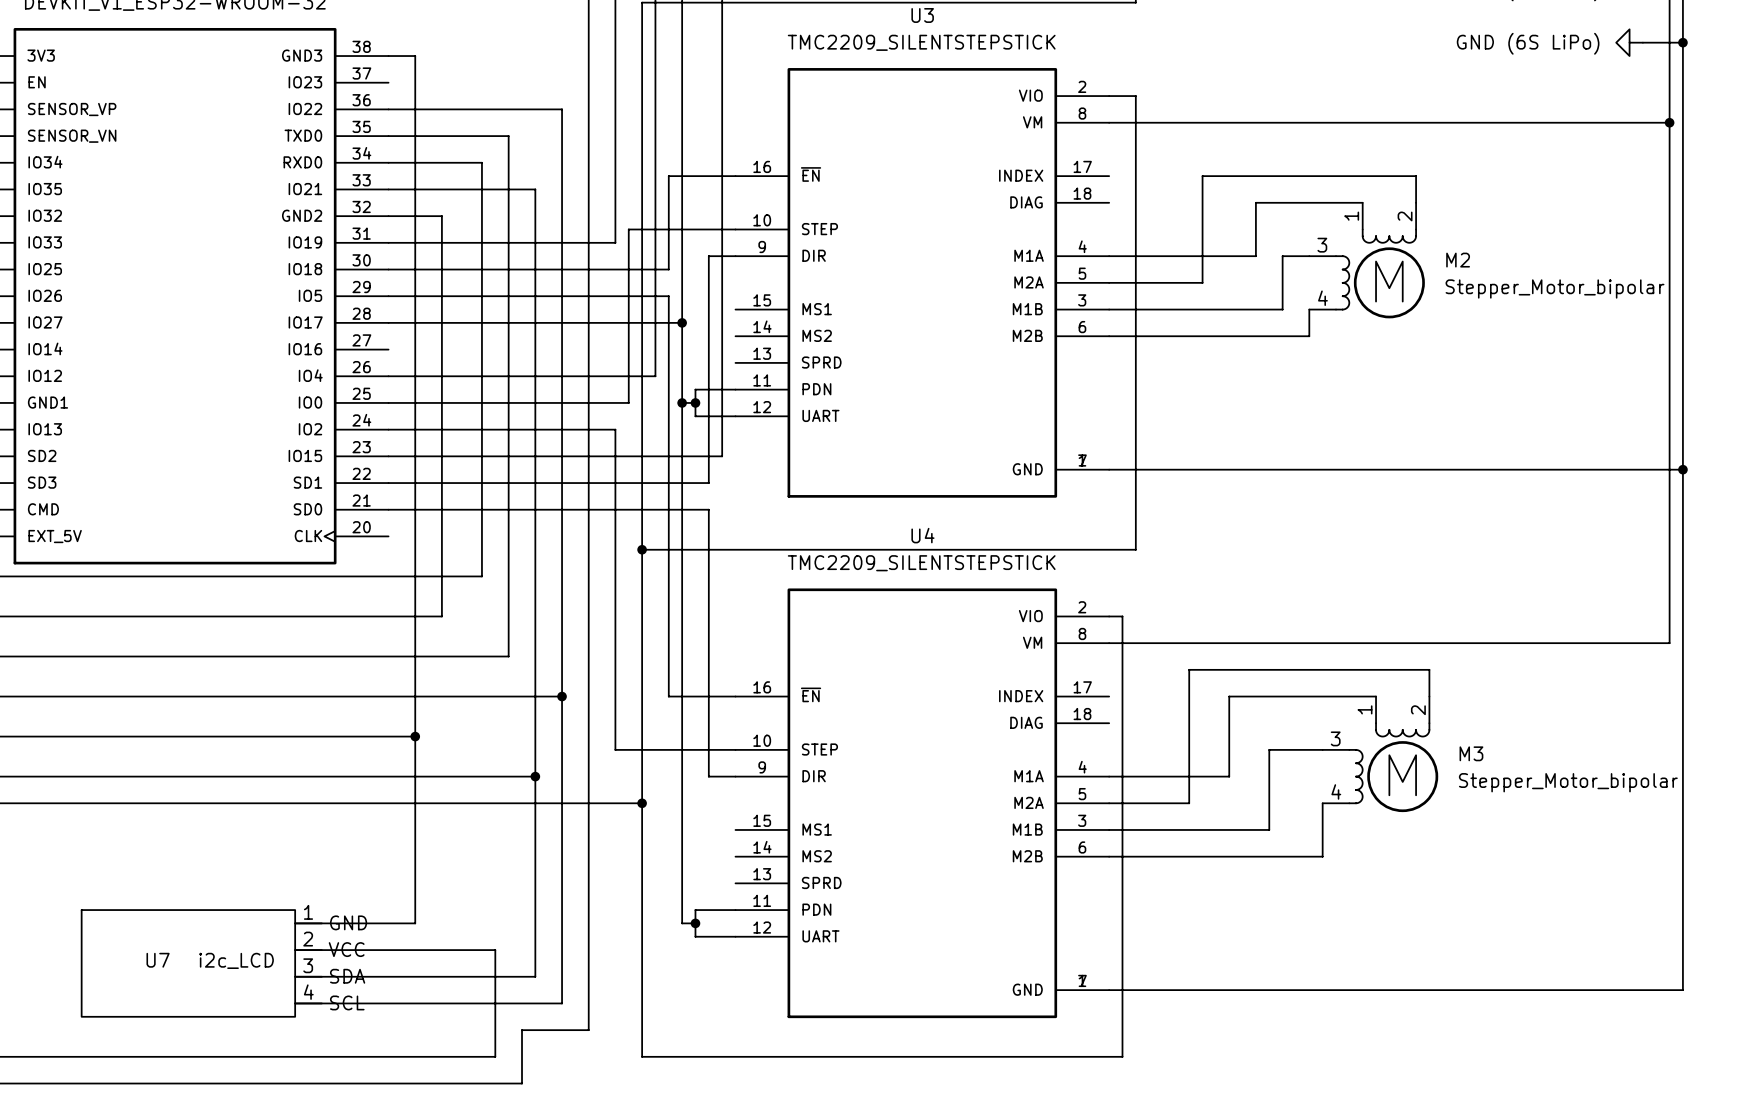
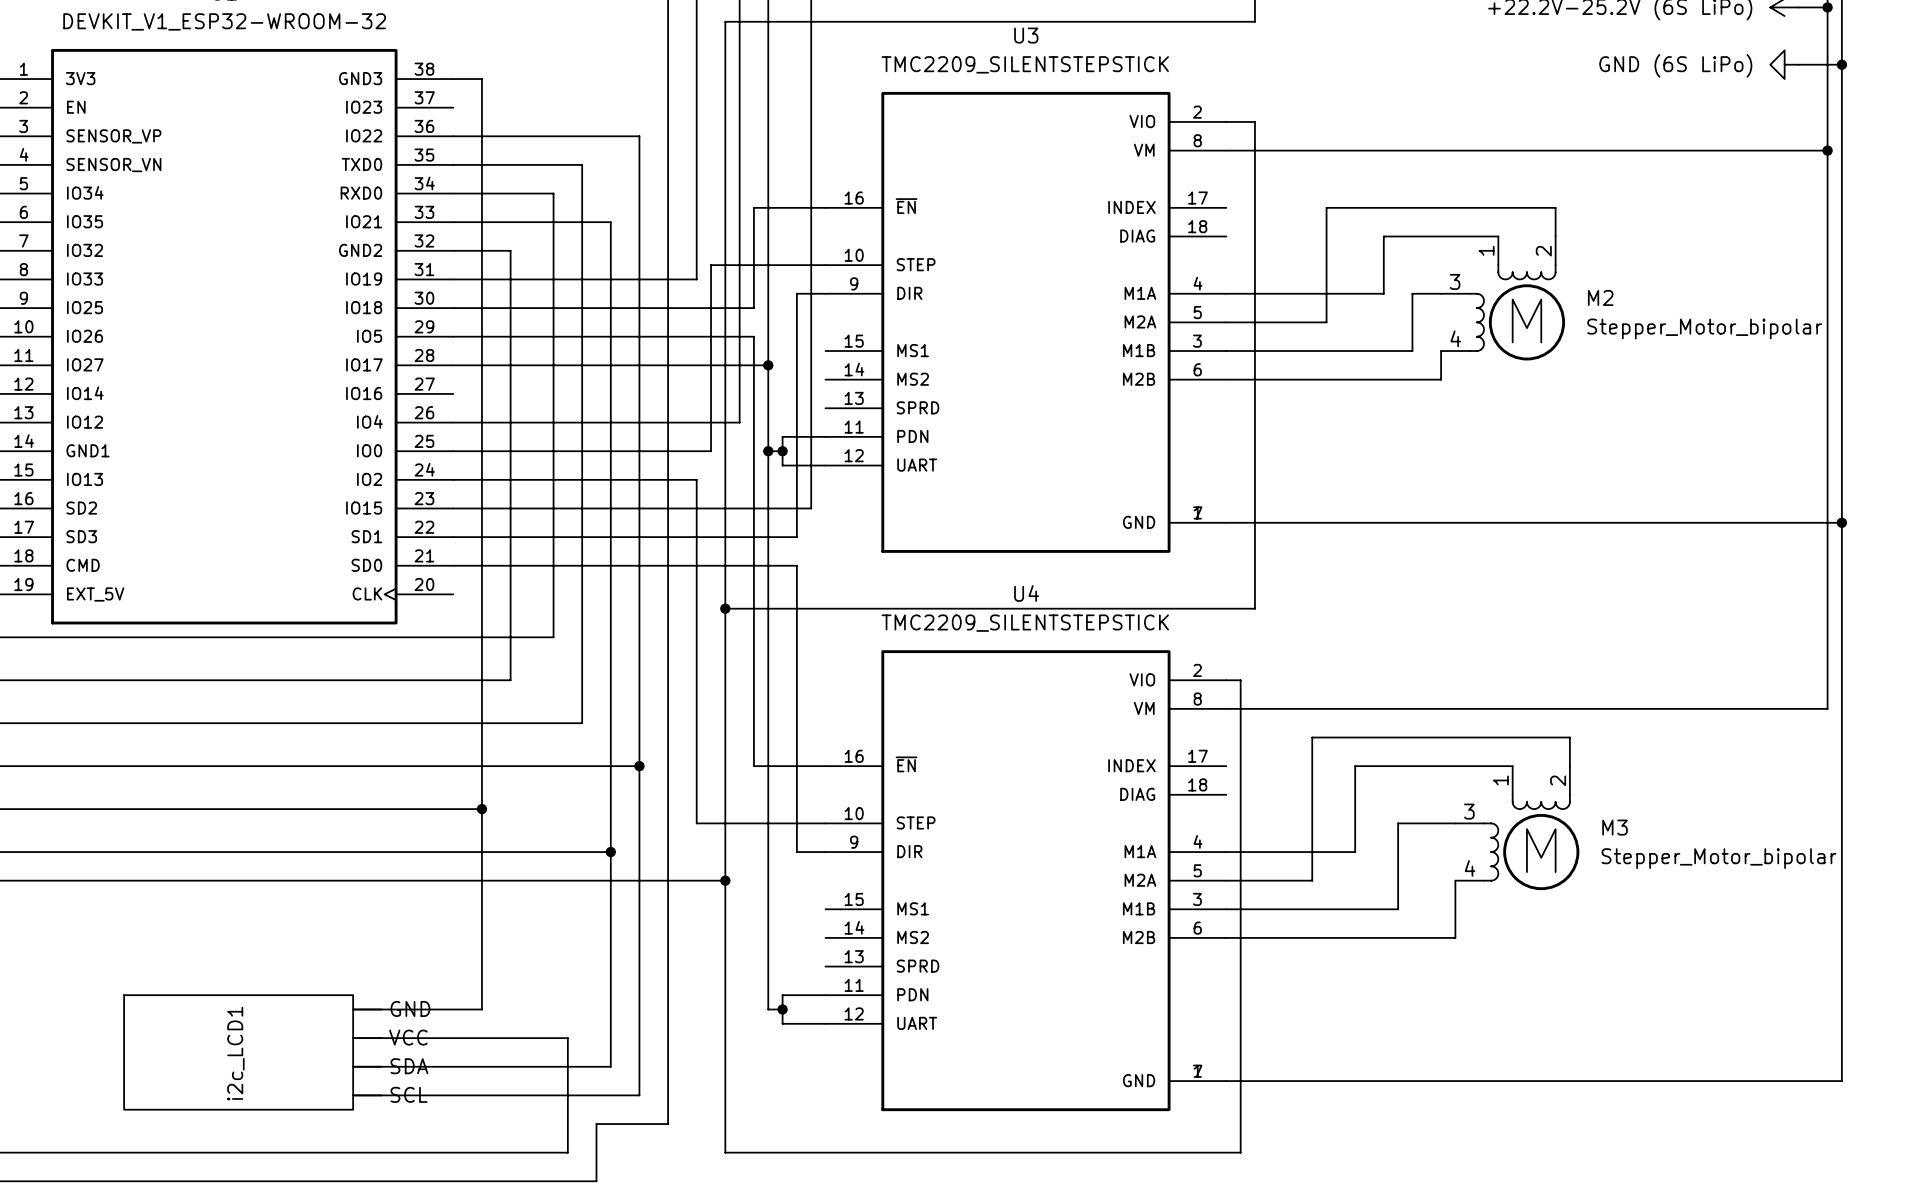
U7 pin number: 1 (308, 912) -> none
U7 pin number: 2 (308, 939) -> none
U7 name: U7 (158, 960) -> i2c_LCD1 (235, 1053)
U7 value: i2c_LCD (236, 960) -> none
U7 pin number: 3 (308, 965) -> none
U7 pin number: 4 (308, 992) -> none

